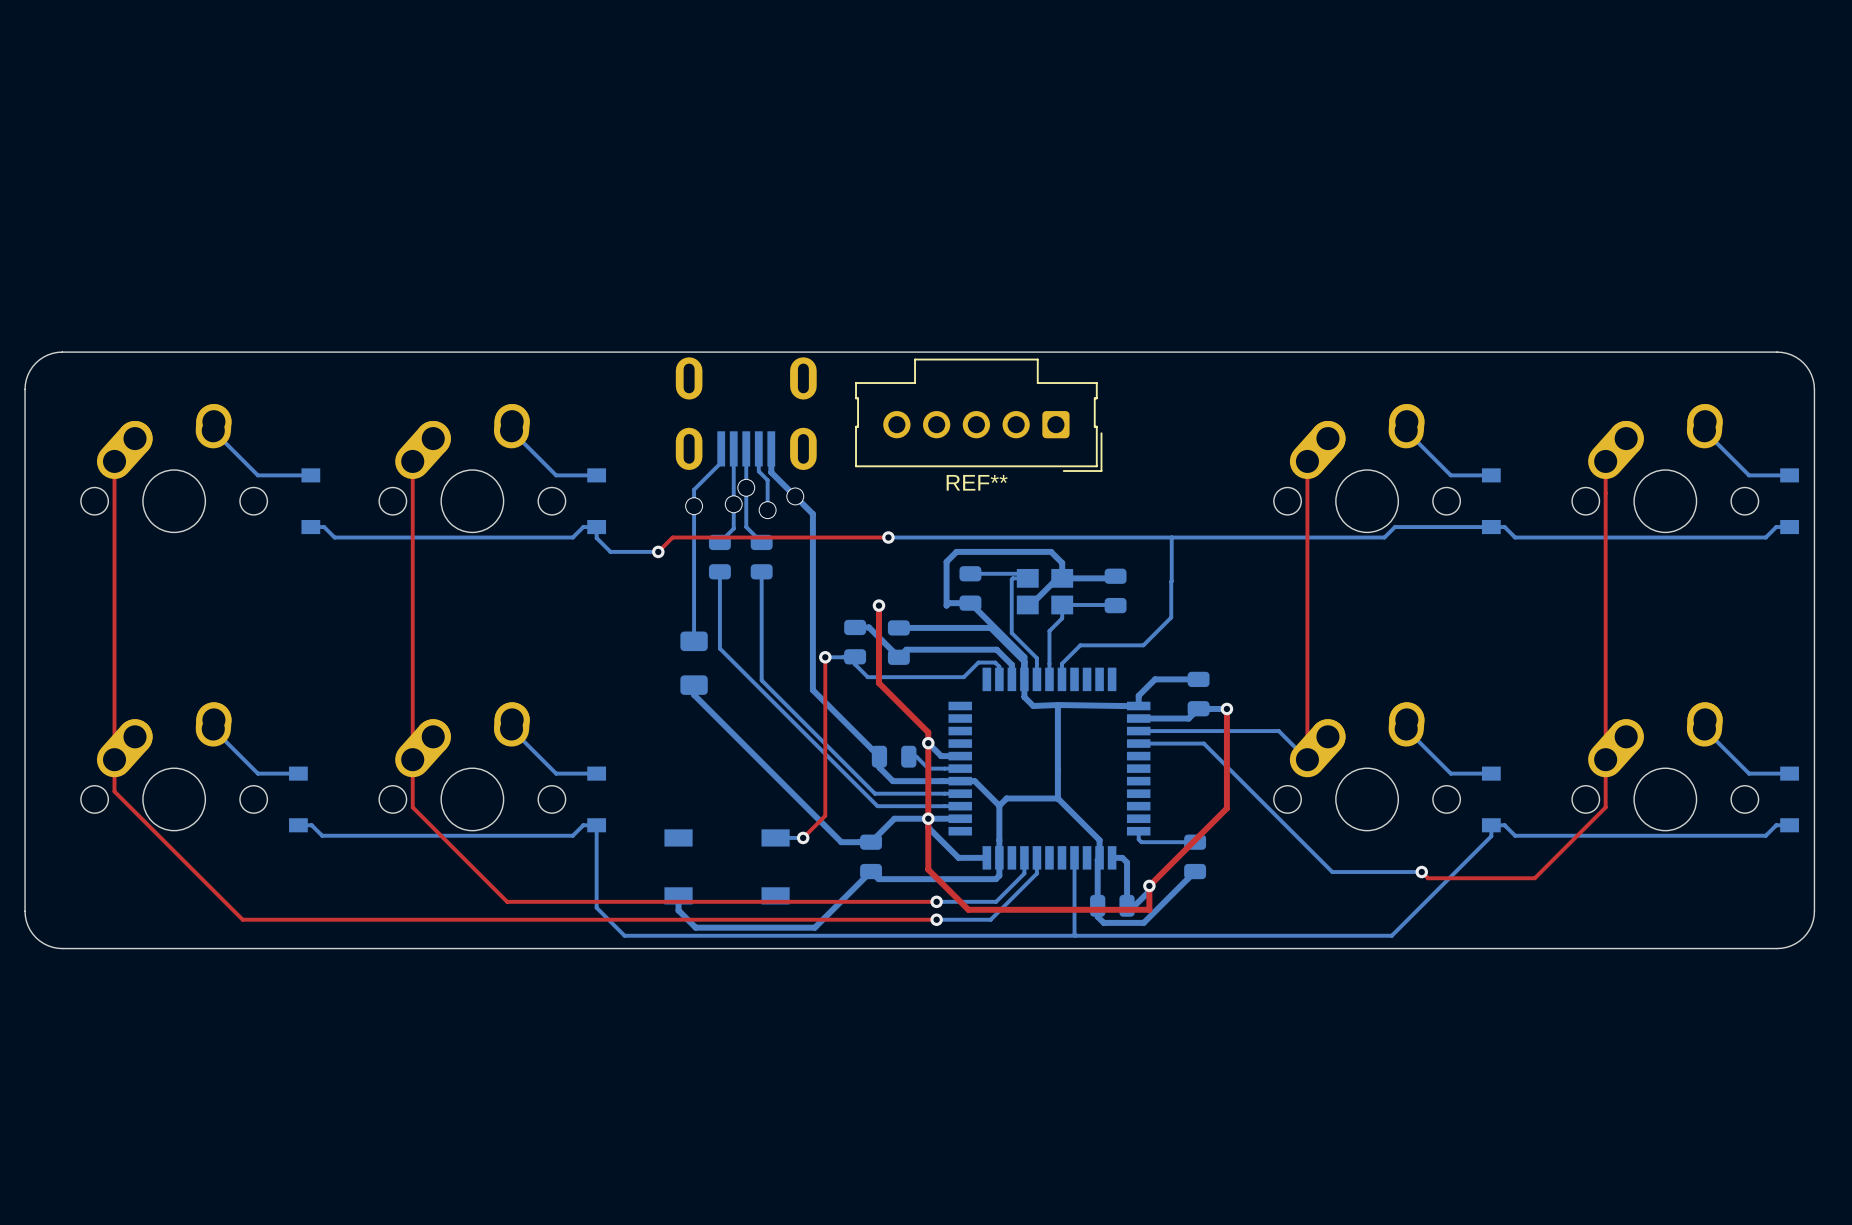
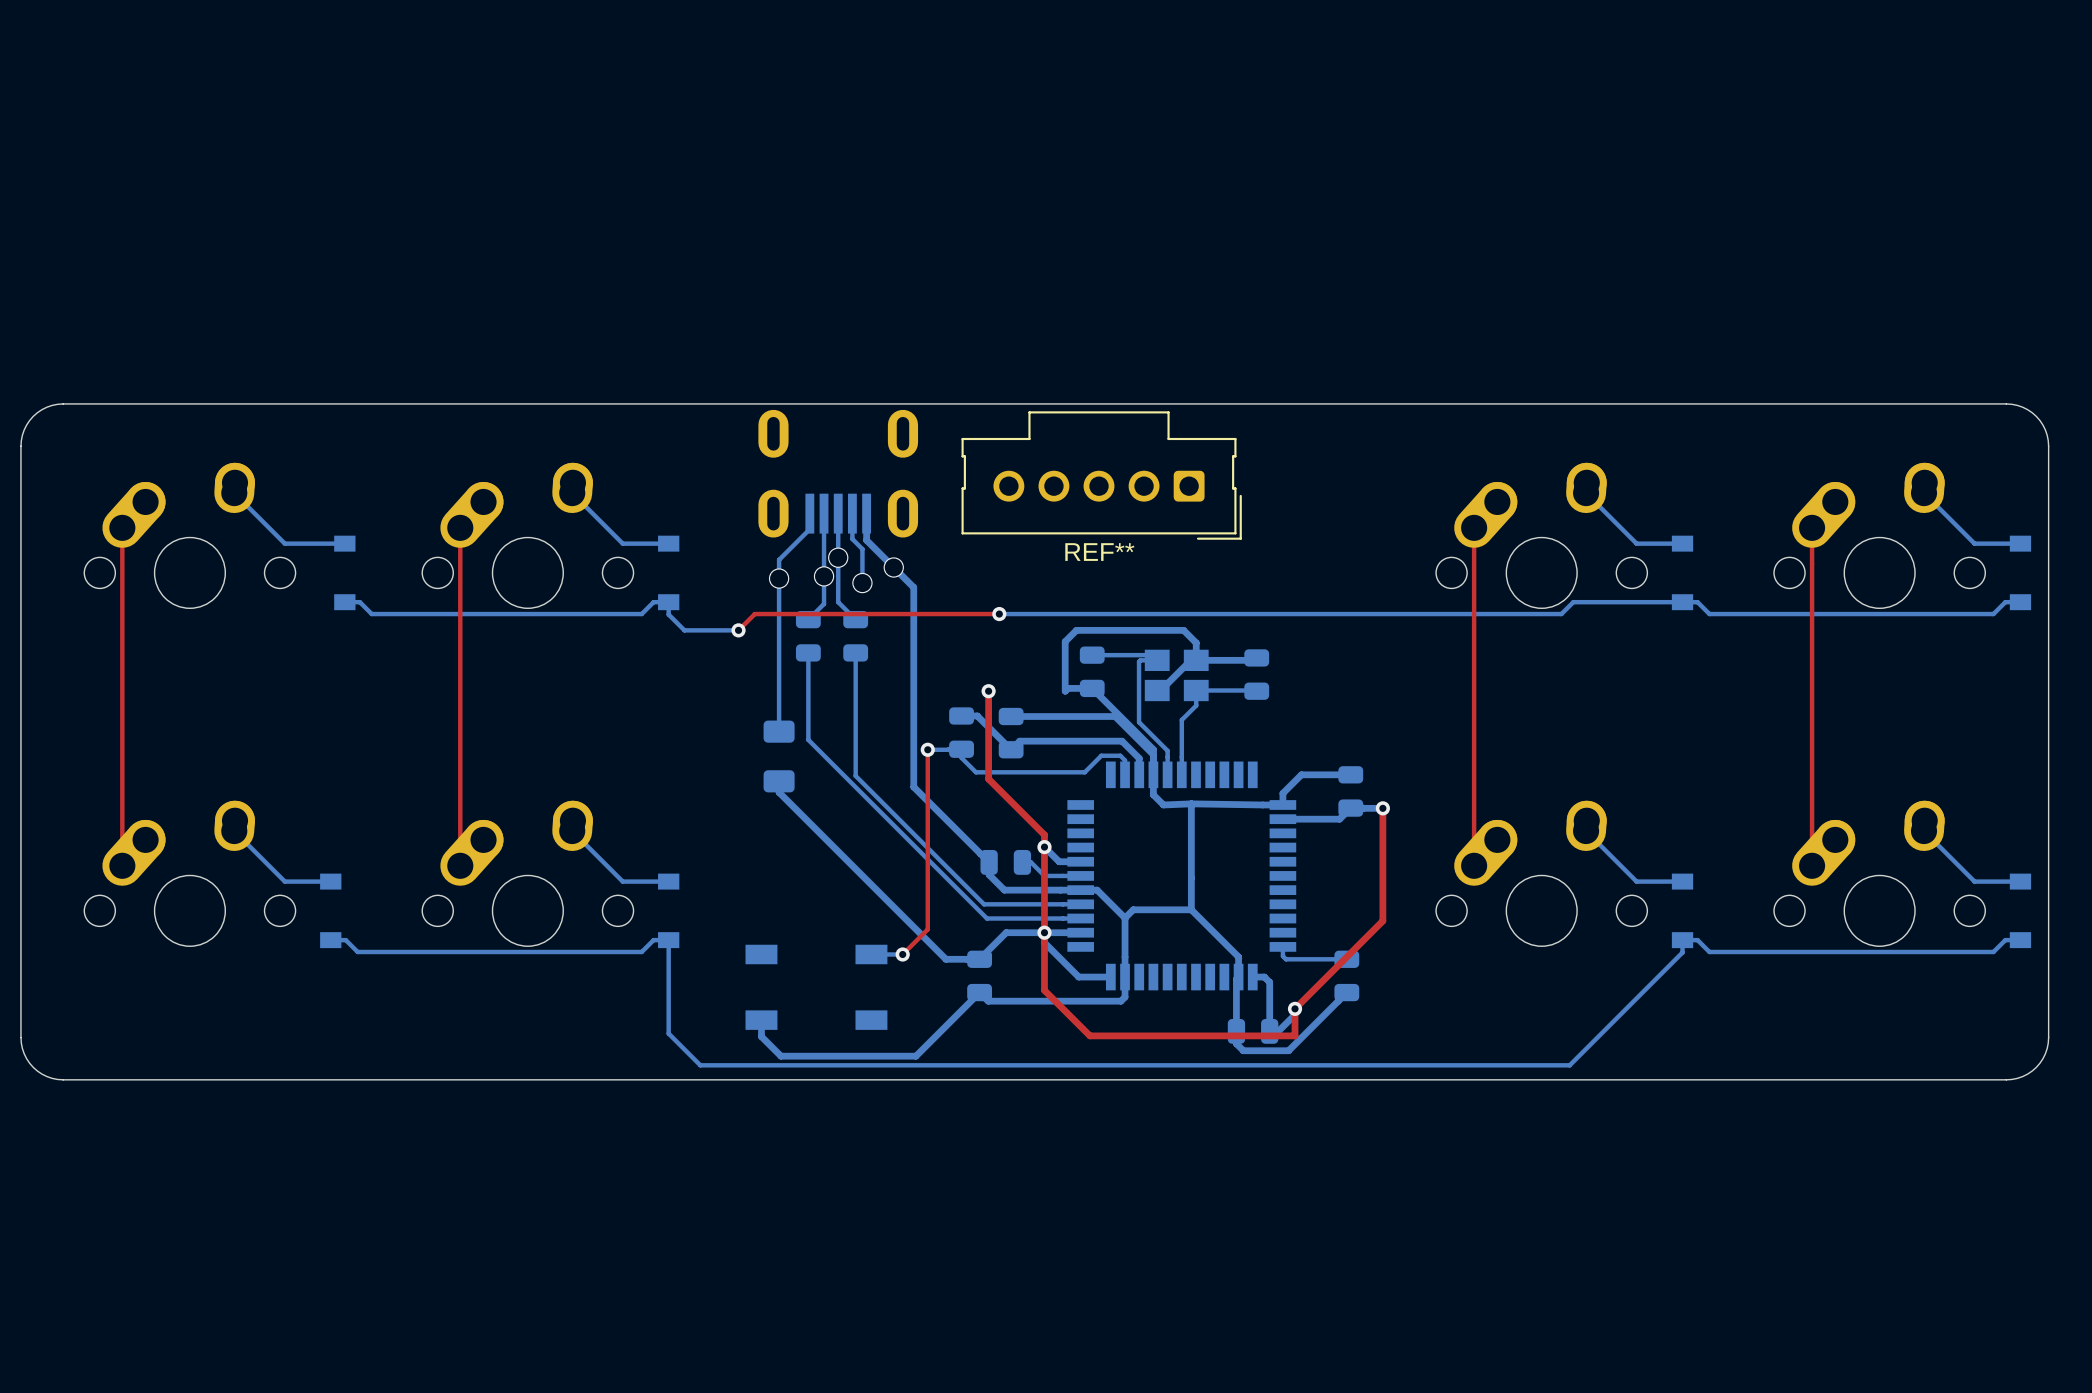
bottom track: (1171, 537) (1171, 617) (1143, 645) (1080, 645) (1061, 663) (1061, 679) -> none
bottom track: (1138, 731) (1278, 731) (1307, 759) -> none
bottom track: (1138, 743) (1203, 743) (1332, 872) (1421, 872) -> none
top track: (114, 759) (114, 791) (242, 919) (936, 919) -> none
top track: (412, 759) (412, 807) (507, 901) (936, 901) -> none
top track: (1605, 759) (1605, 807) (1534, 878) (1428, 878) (1421, 872) -> none
bottom track: (1024, 857) (1024, 873) (996, 901) (936, 901) -> none
bottom track: (1036, 857) (1036, 873) (990, 919) (936, 919) -> none
bottom track: (1074, 857) (1075, 935) -> none
via: (1421, 872) -> none
via: (936, 901) -> none
via: (936, 919) -> none

